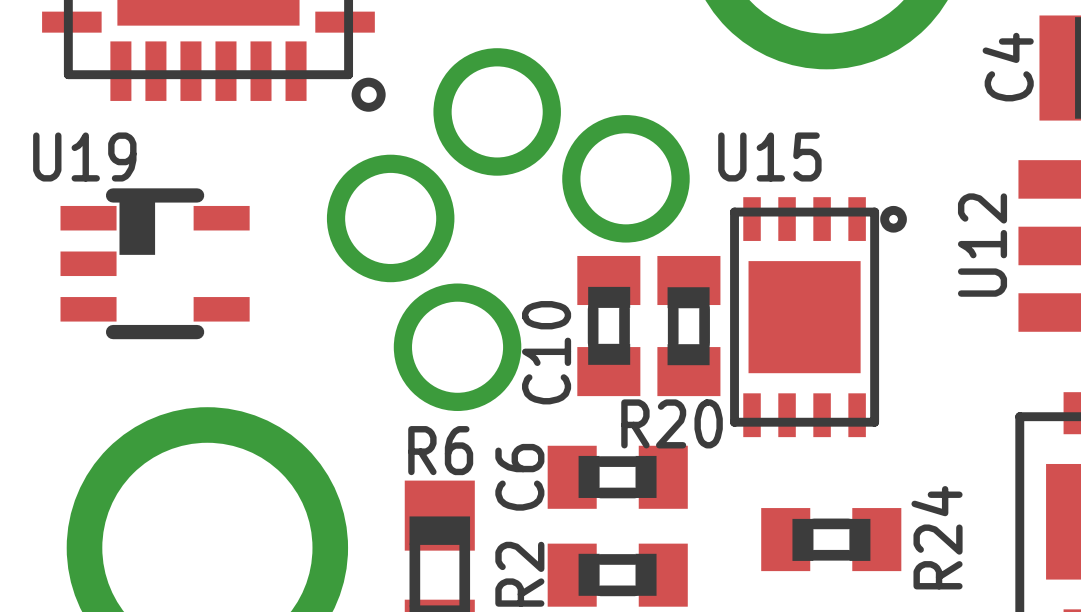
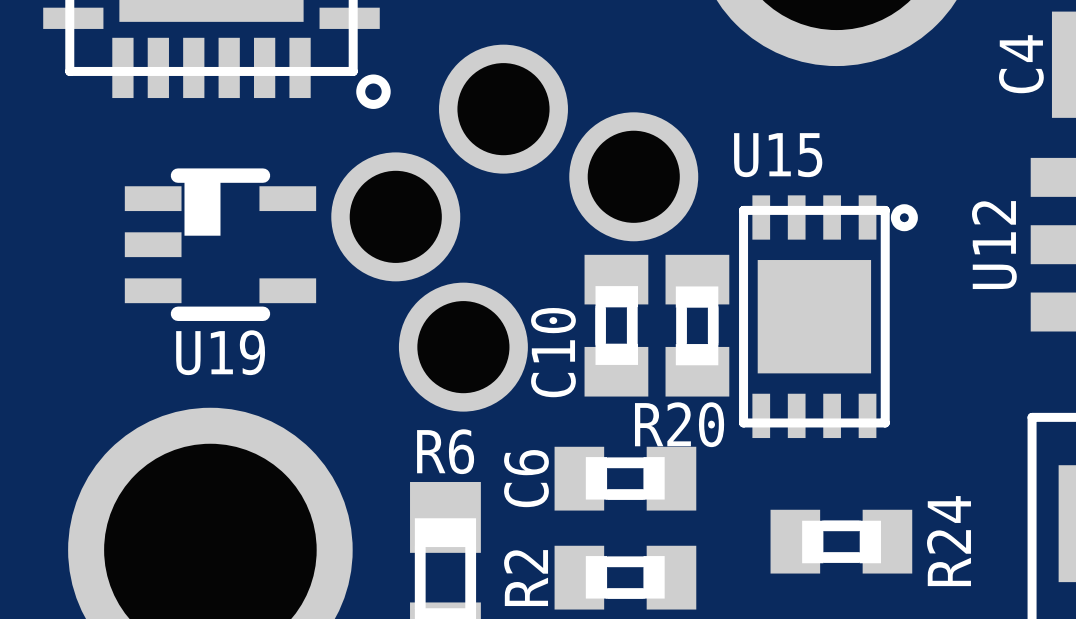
U19 name position: U19 (84, 156) -> U19 (220, 352)
U19 position: (155, 263) -> (220, 244)

